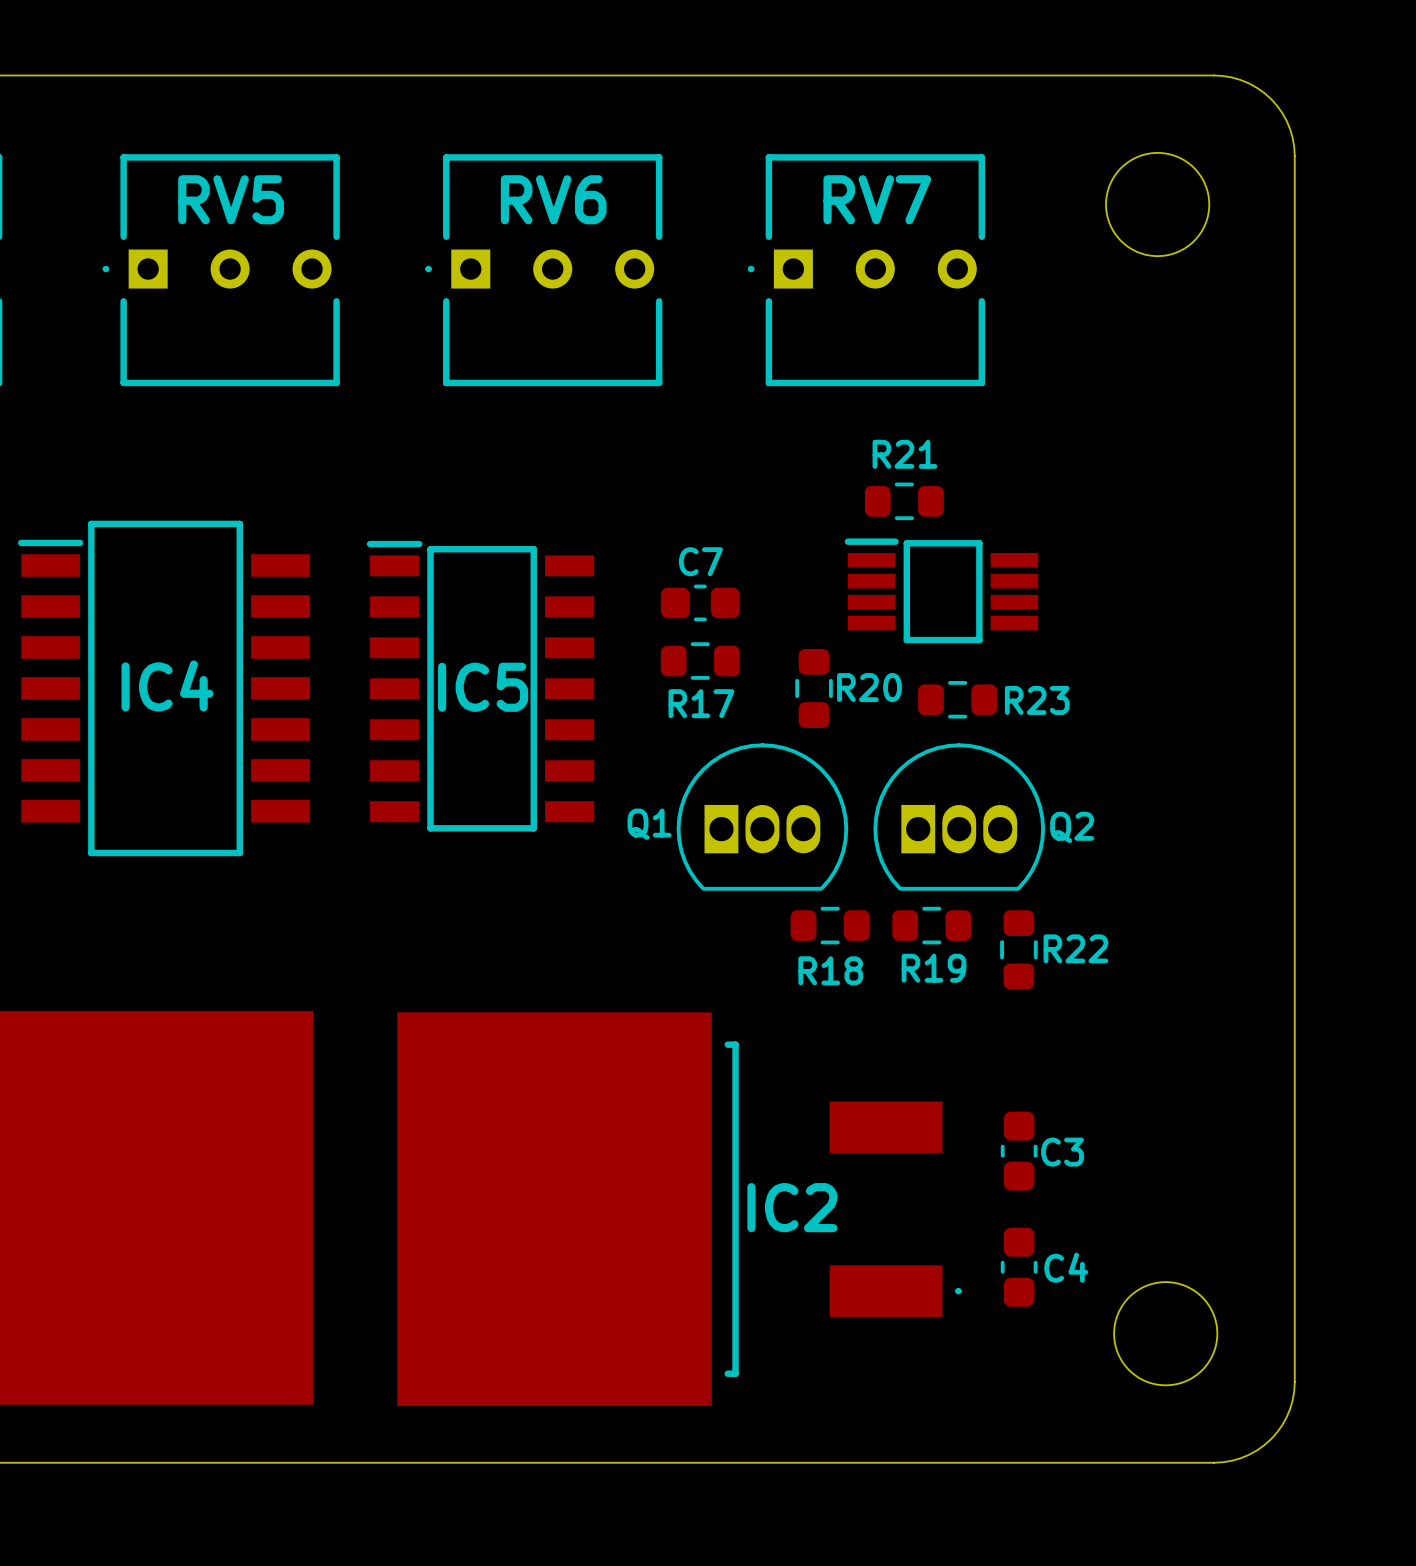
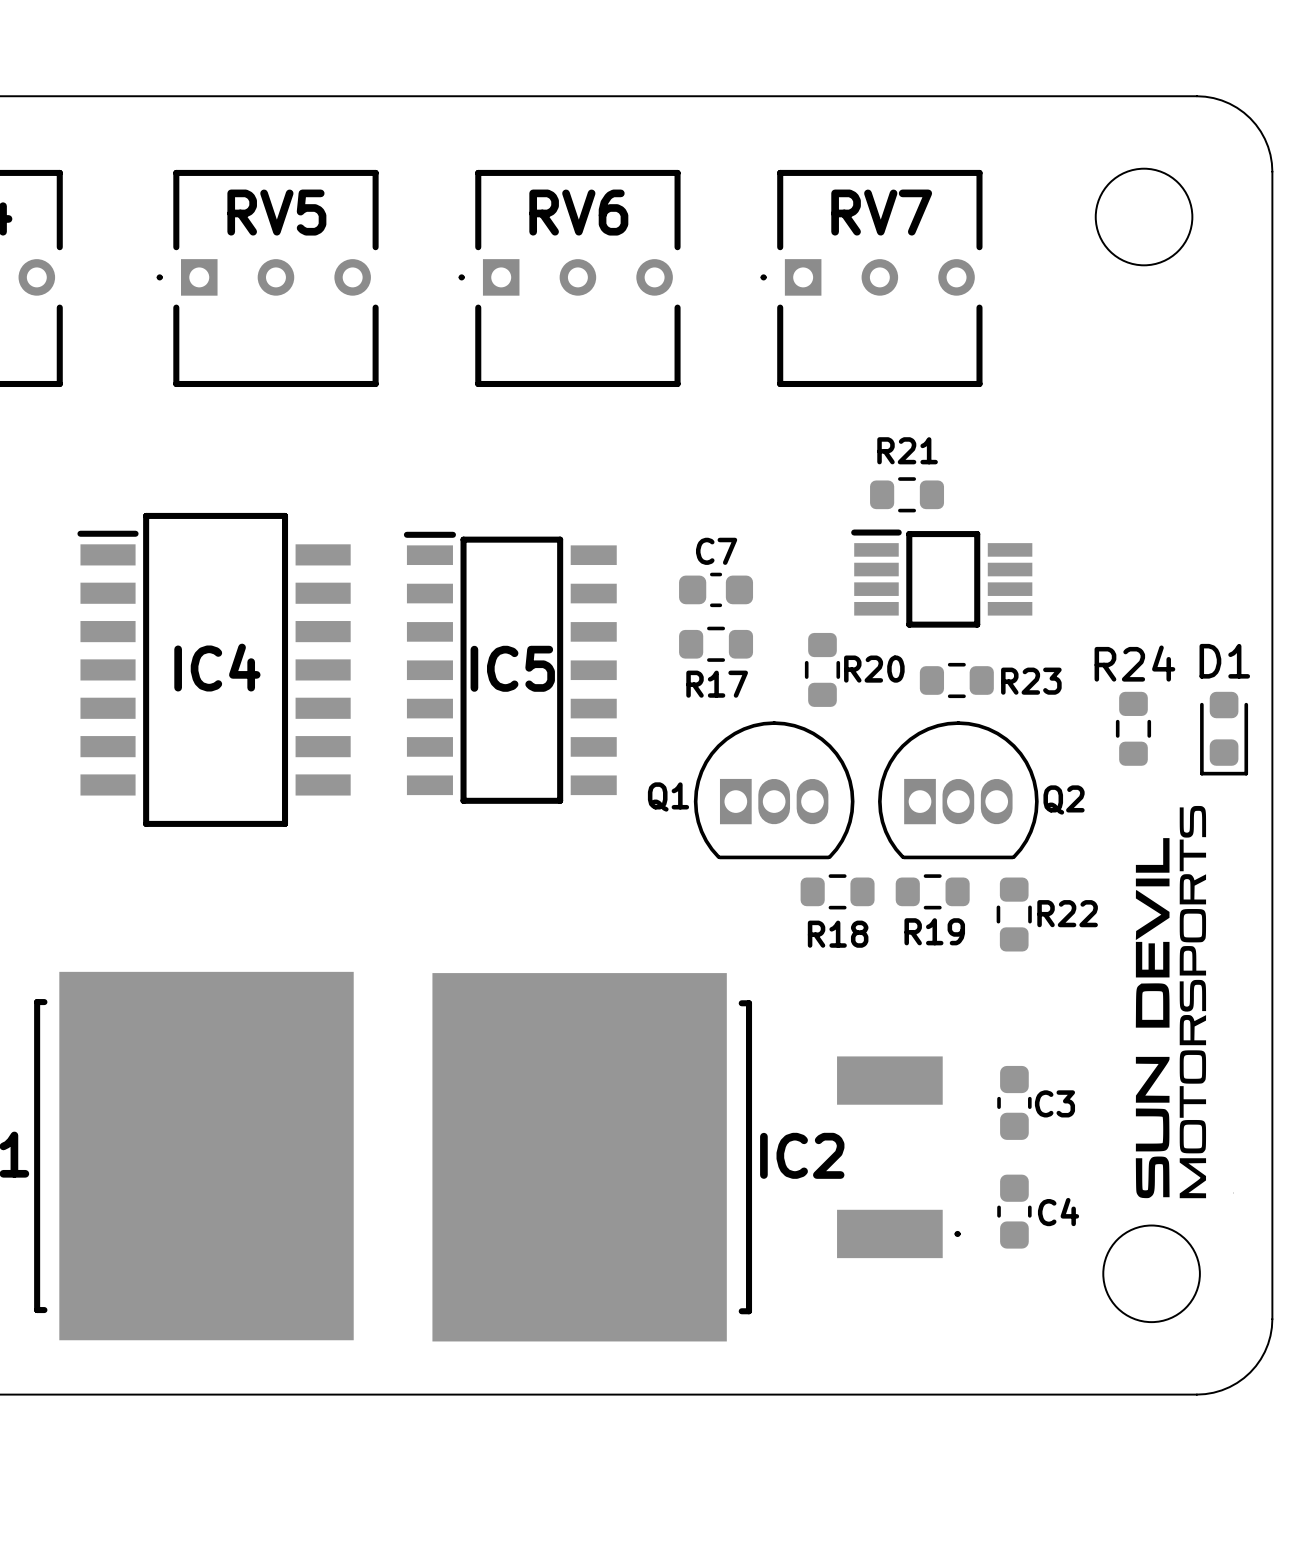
R24: none -> (1133, 728)
D1: none -> (1224, 733)
drawing: none -> [1135, 805, 1234, 1199]

